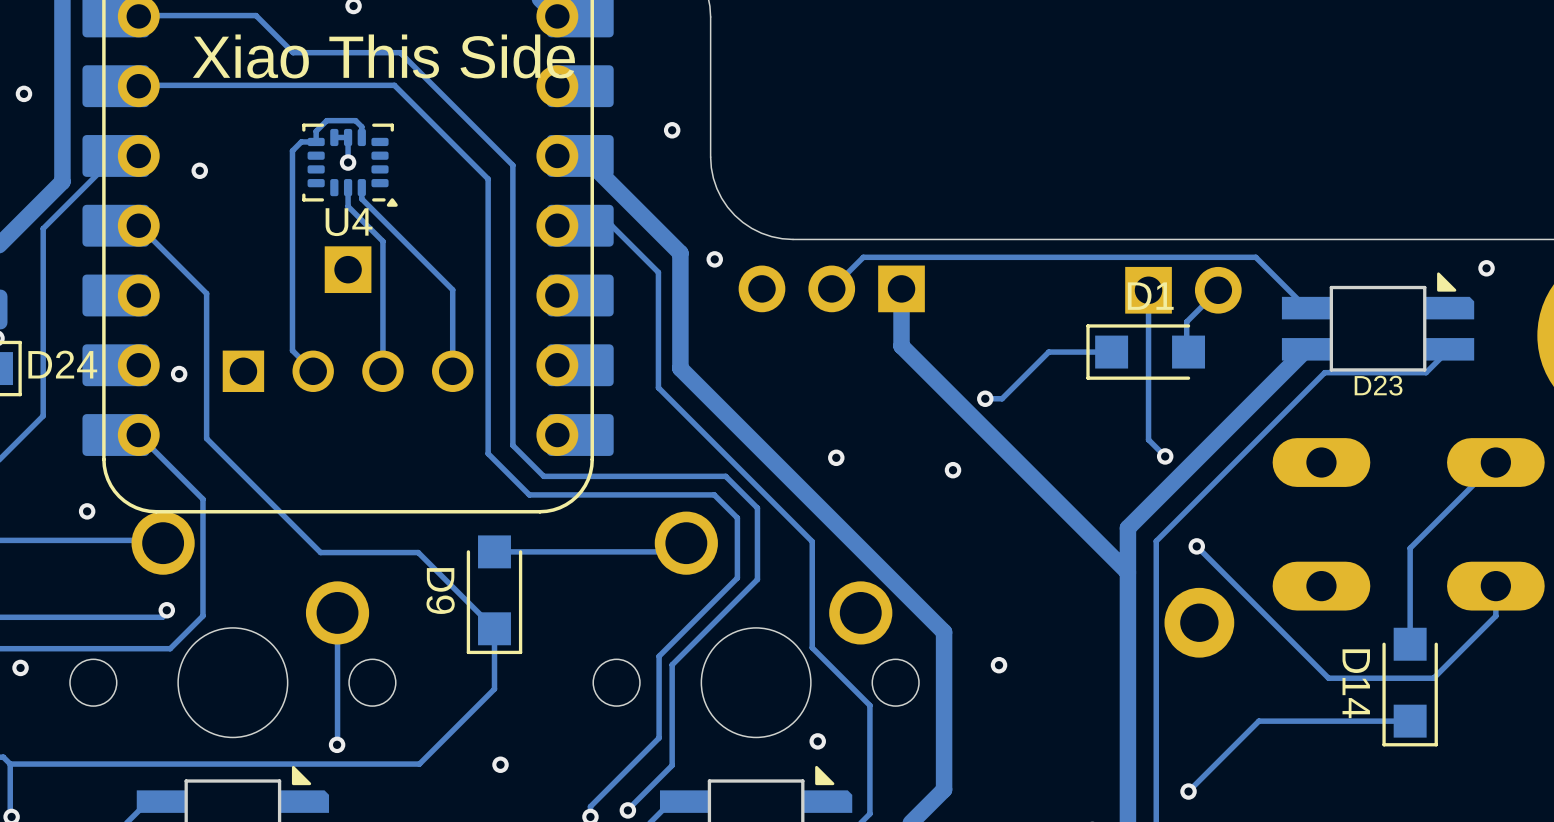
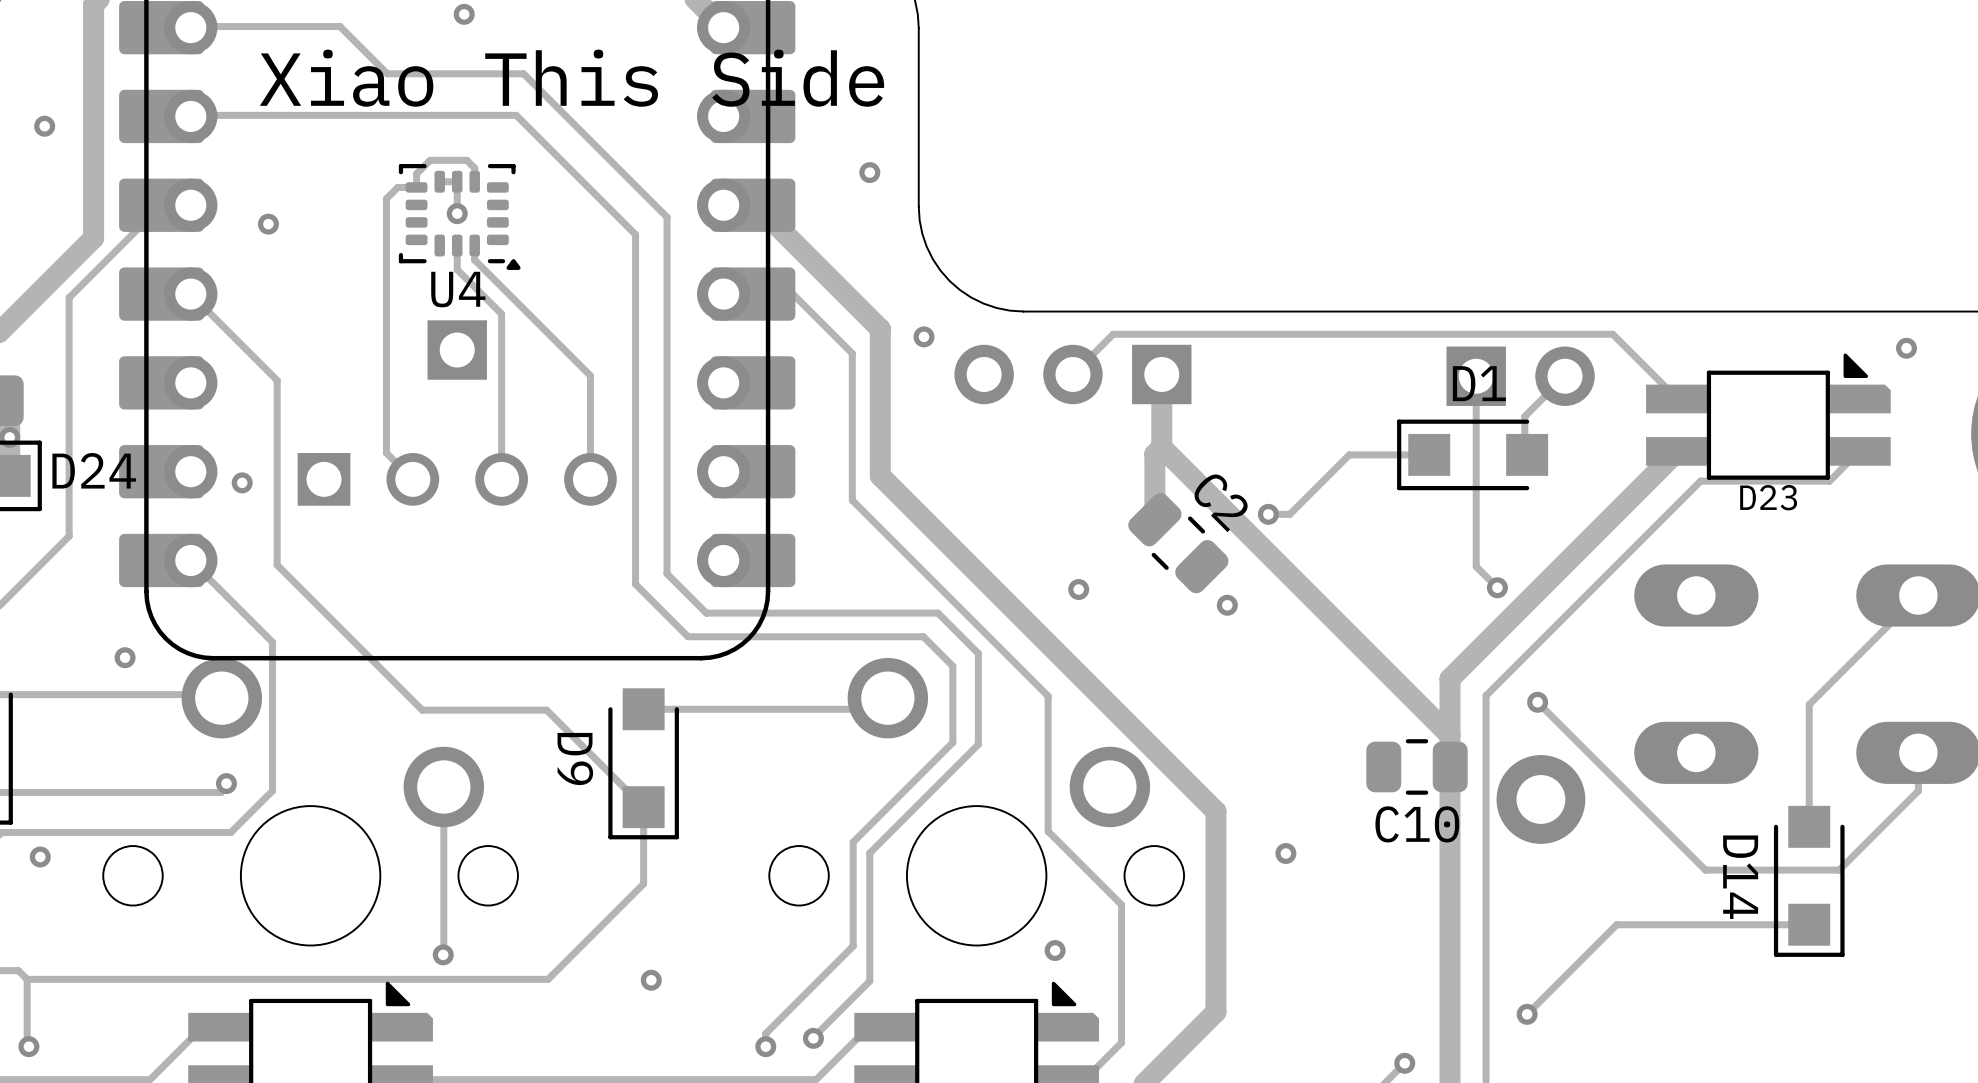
track: none -> (1161, 447) (1154, 454) (1154, 519)
C2: none -> (1178, 543)
C10: none -> (1417, 766)

